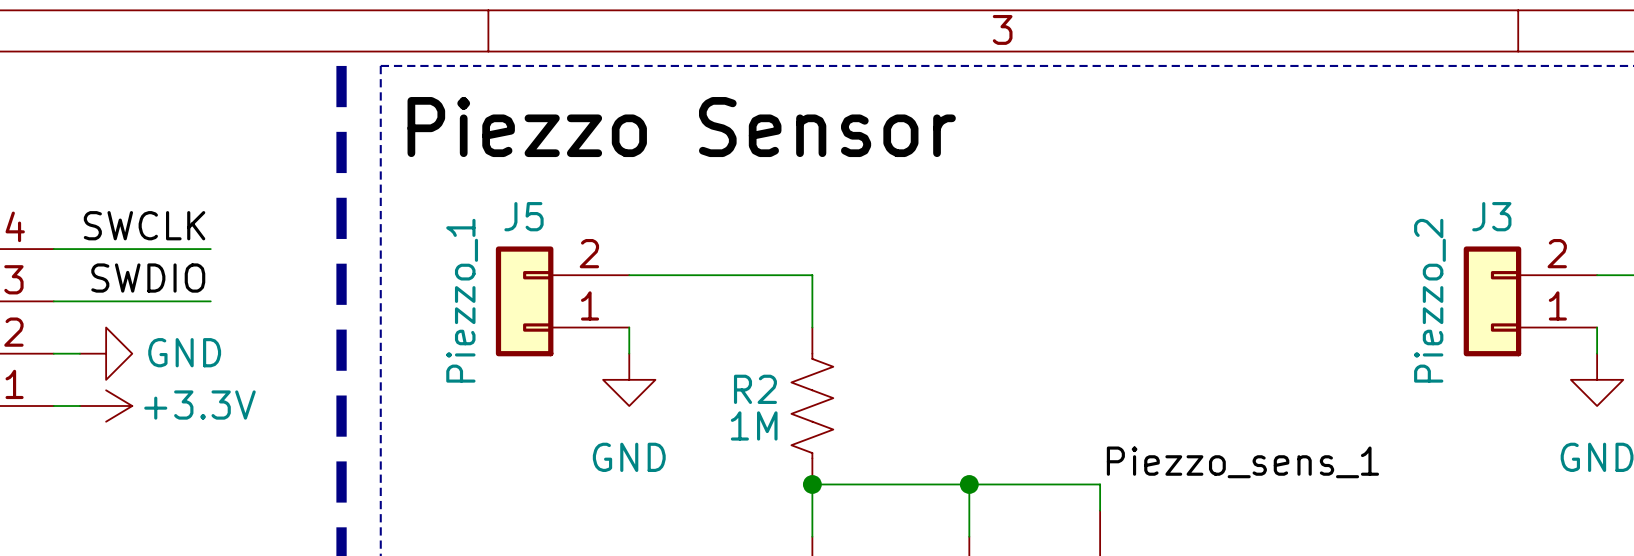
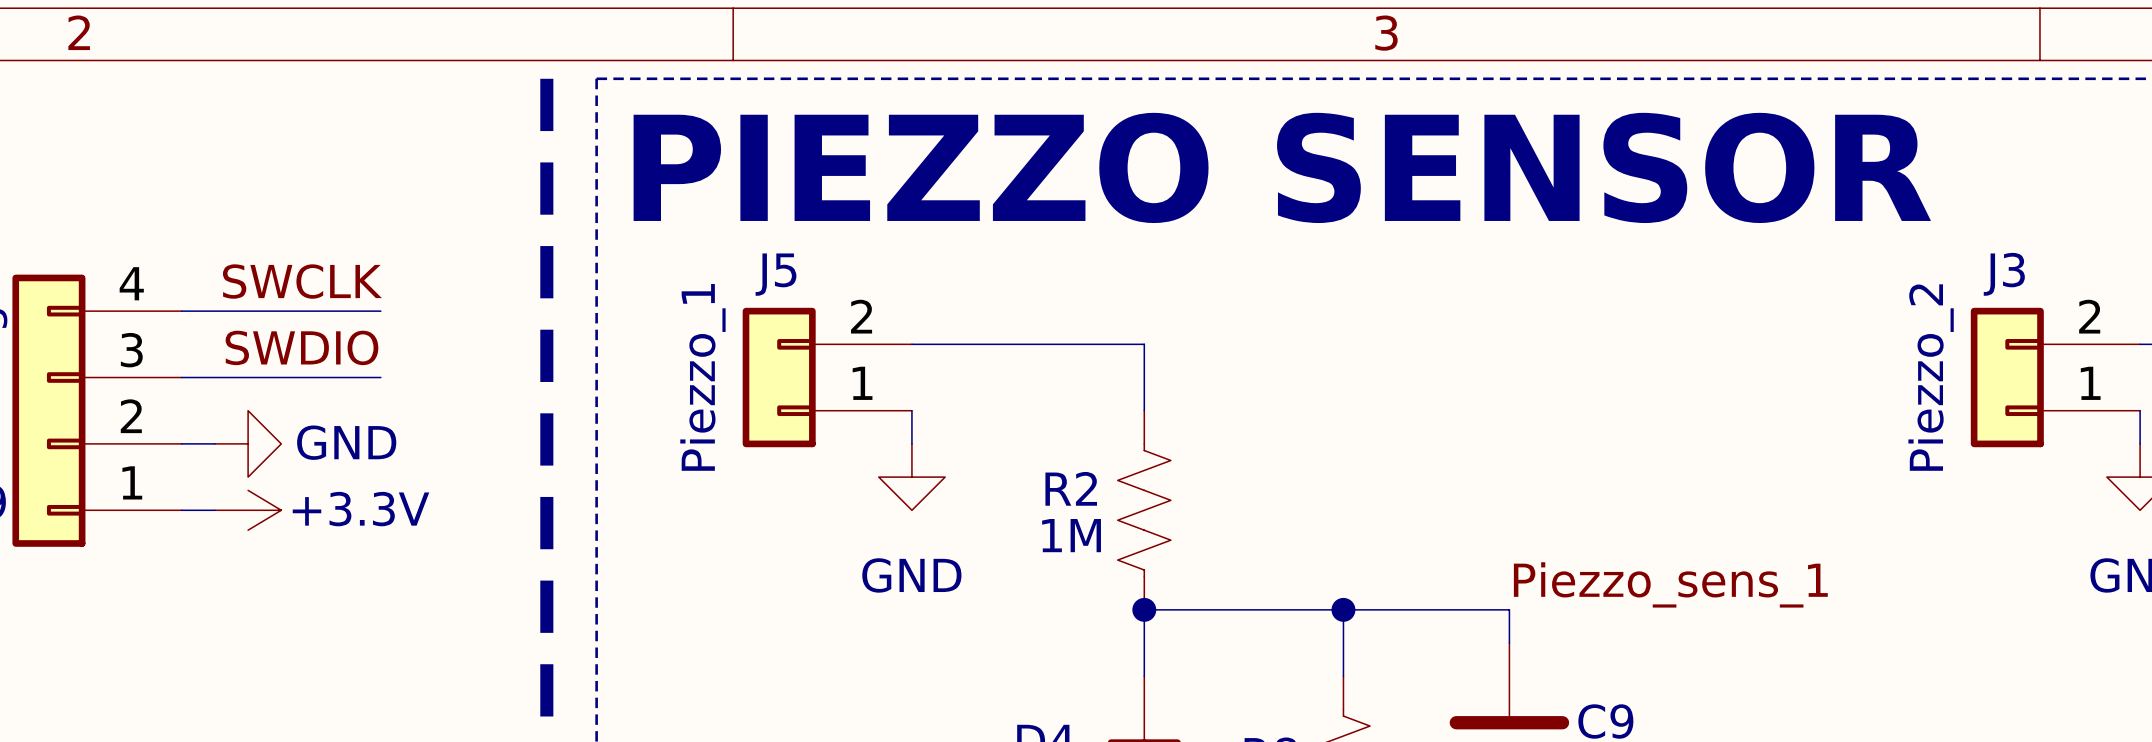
label: Piezzo Sensor (681, 127) -> none
text: none -> PIEZZO SENSOR (1282, 167)

